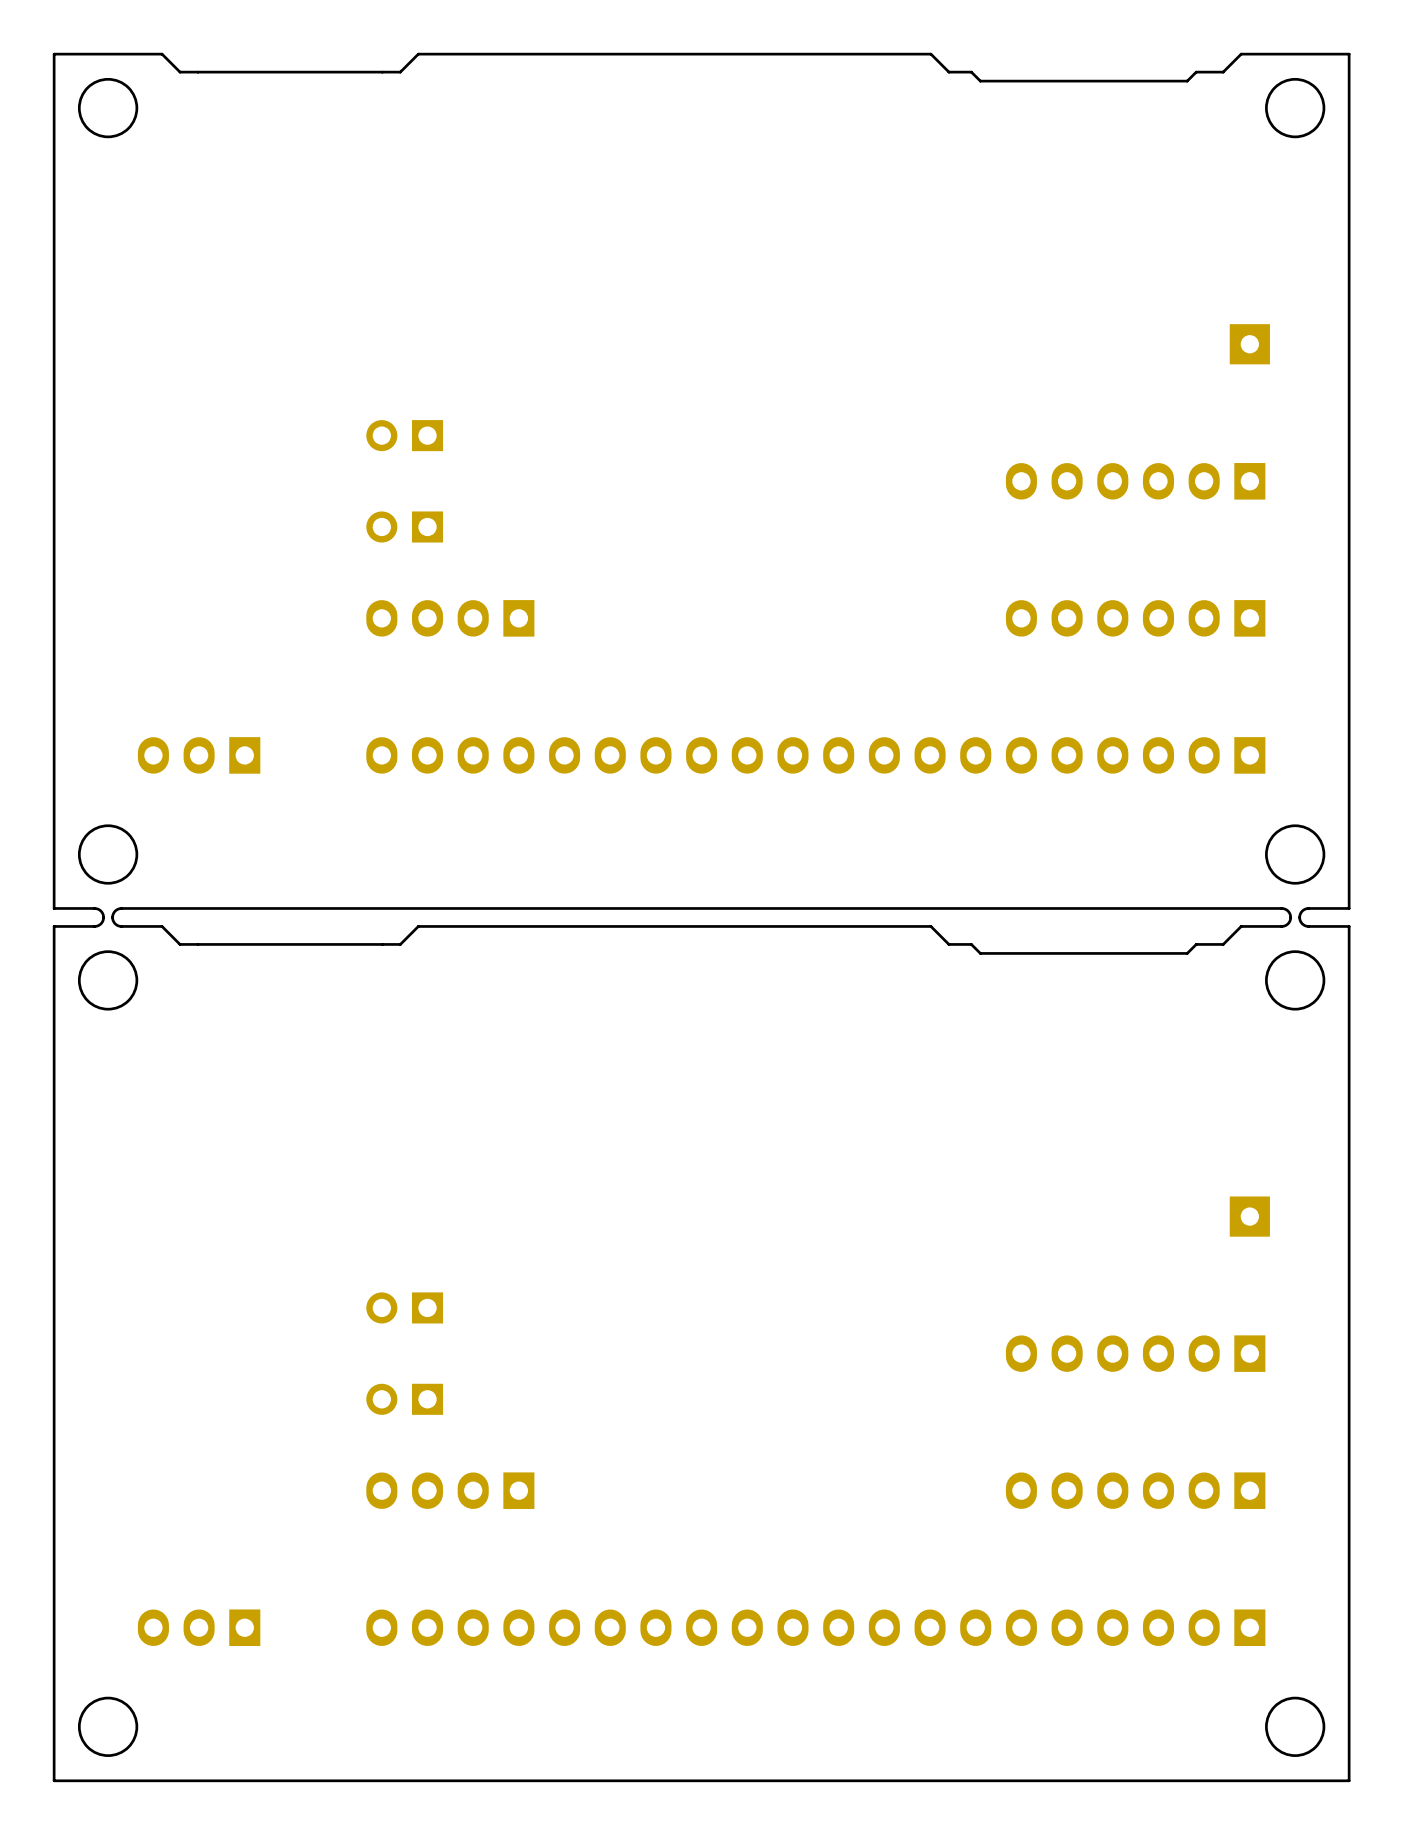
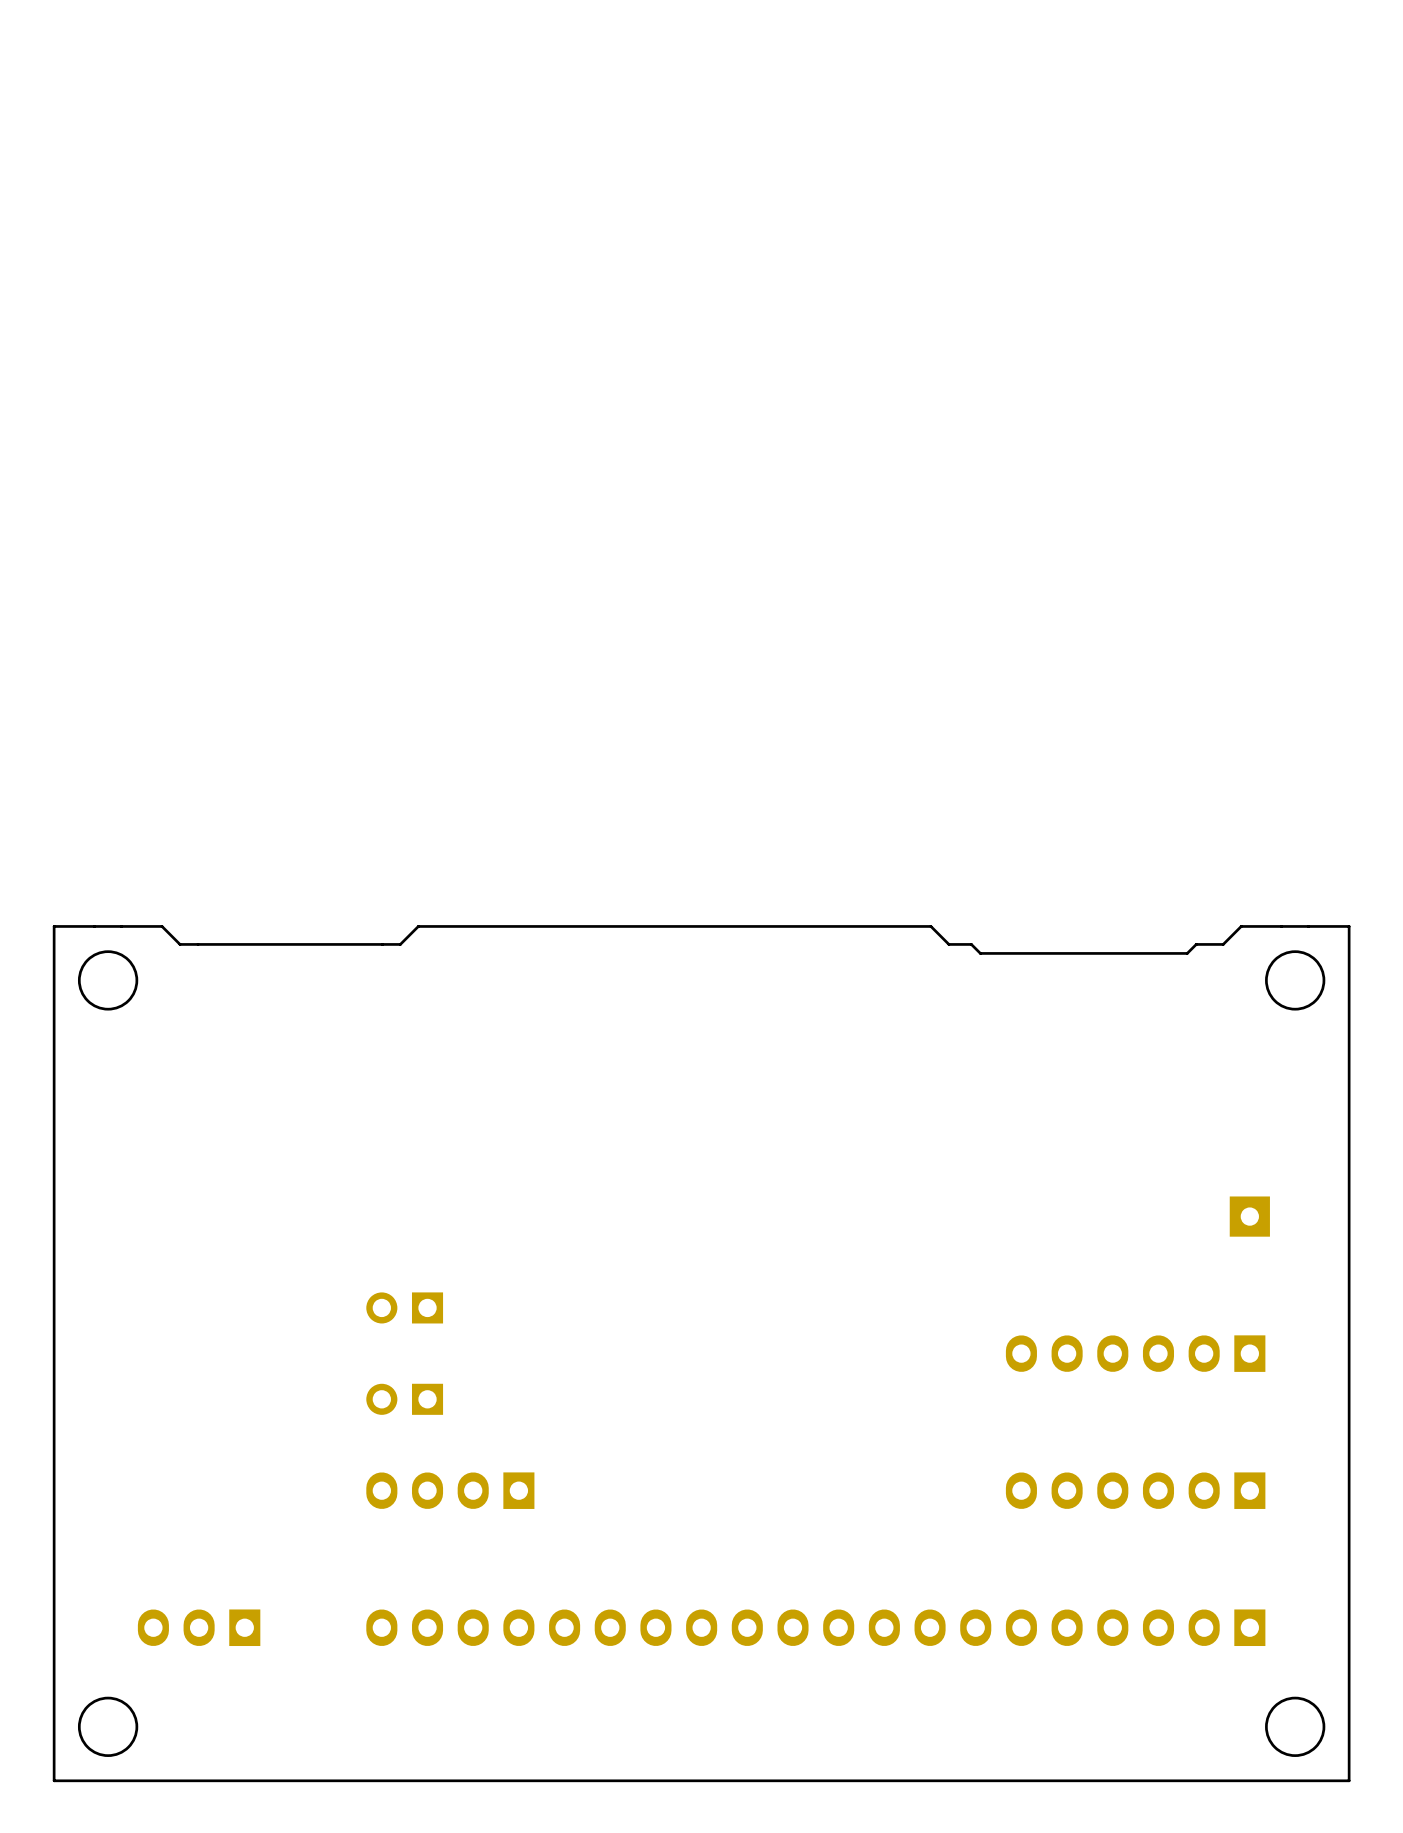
round board edge: [77, 77, 139, 139] -> none
round board edge: [1265, 77, 1326, 139] -> none
part: (1249, 344) -> none
part: (404, 435) -> none
part: (1135, 481) -> none
part: (404, 526) -> none
part: (450, 618) -> none
part: (1135, 618) -> none
part: (199, 755) -> none
part: (815, 755) -> none
round board edge: [77, 824, 139, 885] -> none
round board edge: [1265, 824, 1326, 885] -> none
board edge: (1281, 926) (1288, 923) (1290, 917) (1288, 911) (1281, 908) (121, 908) (115, 911) (112, 917) (115, 923) (121, 926) -> (94, 926) (121, 926)
board edge: (1308, 926) (1303, 924) (1299, 918) (1300, 912) (1305, 909) (1349, 908) (1349, 54) (1241, 54) (1223, 72) (1196, 72) (1187, 81) (980, 81) (971, 72) (948, 72) (930, 54) (418, 54) (400, 72) (180, 72) (162, 54) (54, 54) (54, 908) (98, 909) (102, 914) (103, 919) (100, 924) (94, 926) -> (1308, 926) (1281, 926)

